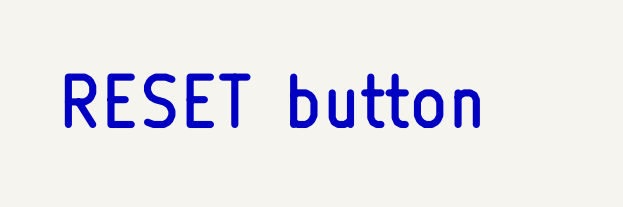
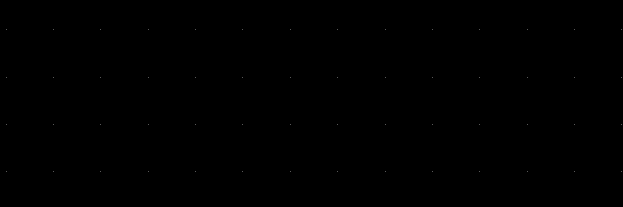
text: RESET button (272, 100) -> none

